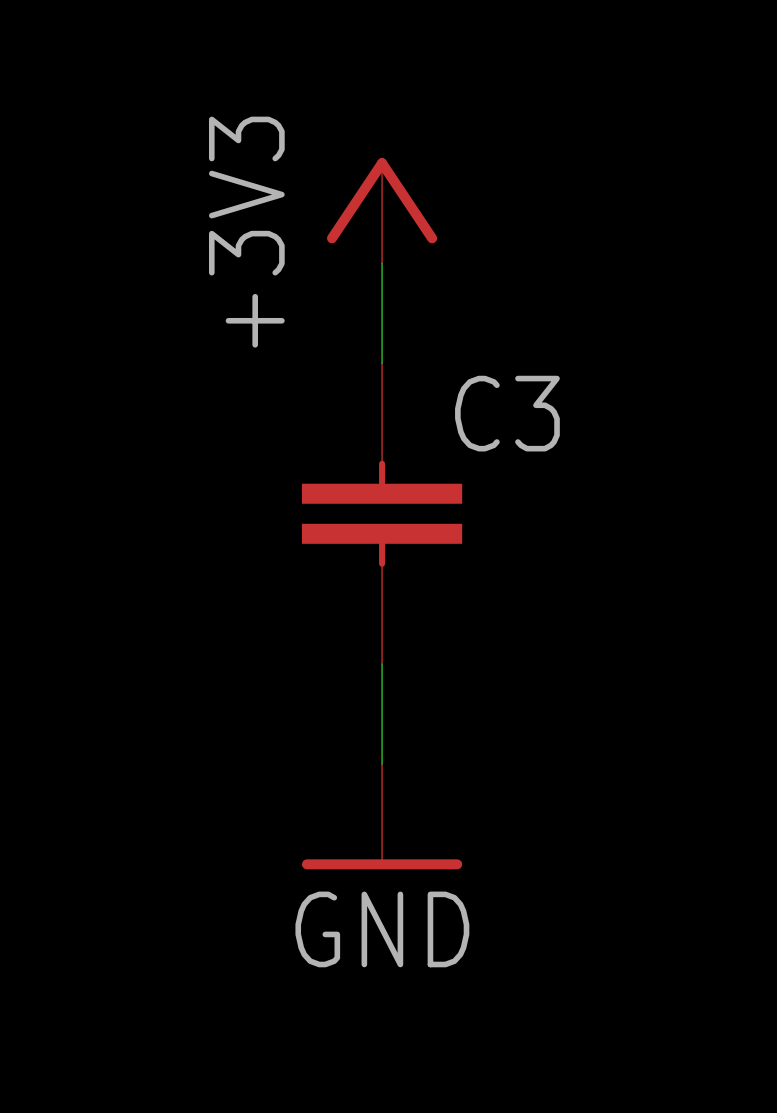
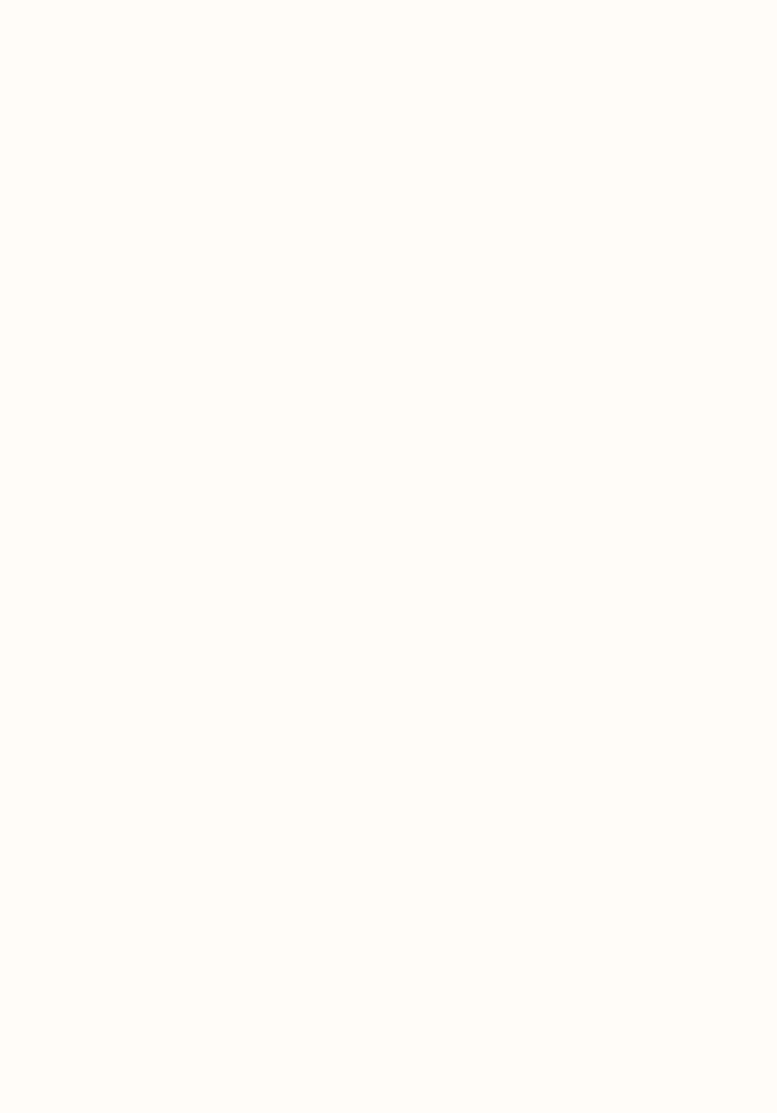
power symbol: +3V3 (382, 210) -> none
wire: (382, 263) (382, 363) -> none
C3: (382, 513) -> none
wire: (382, 664) (382, 764) -> none
power symbol: GND (382, 816) -> none

